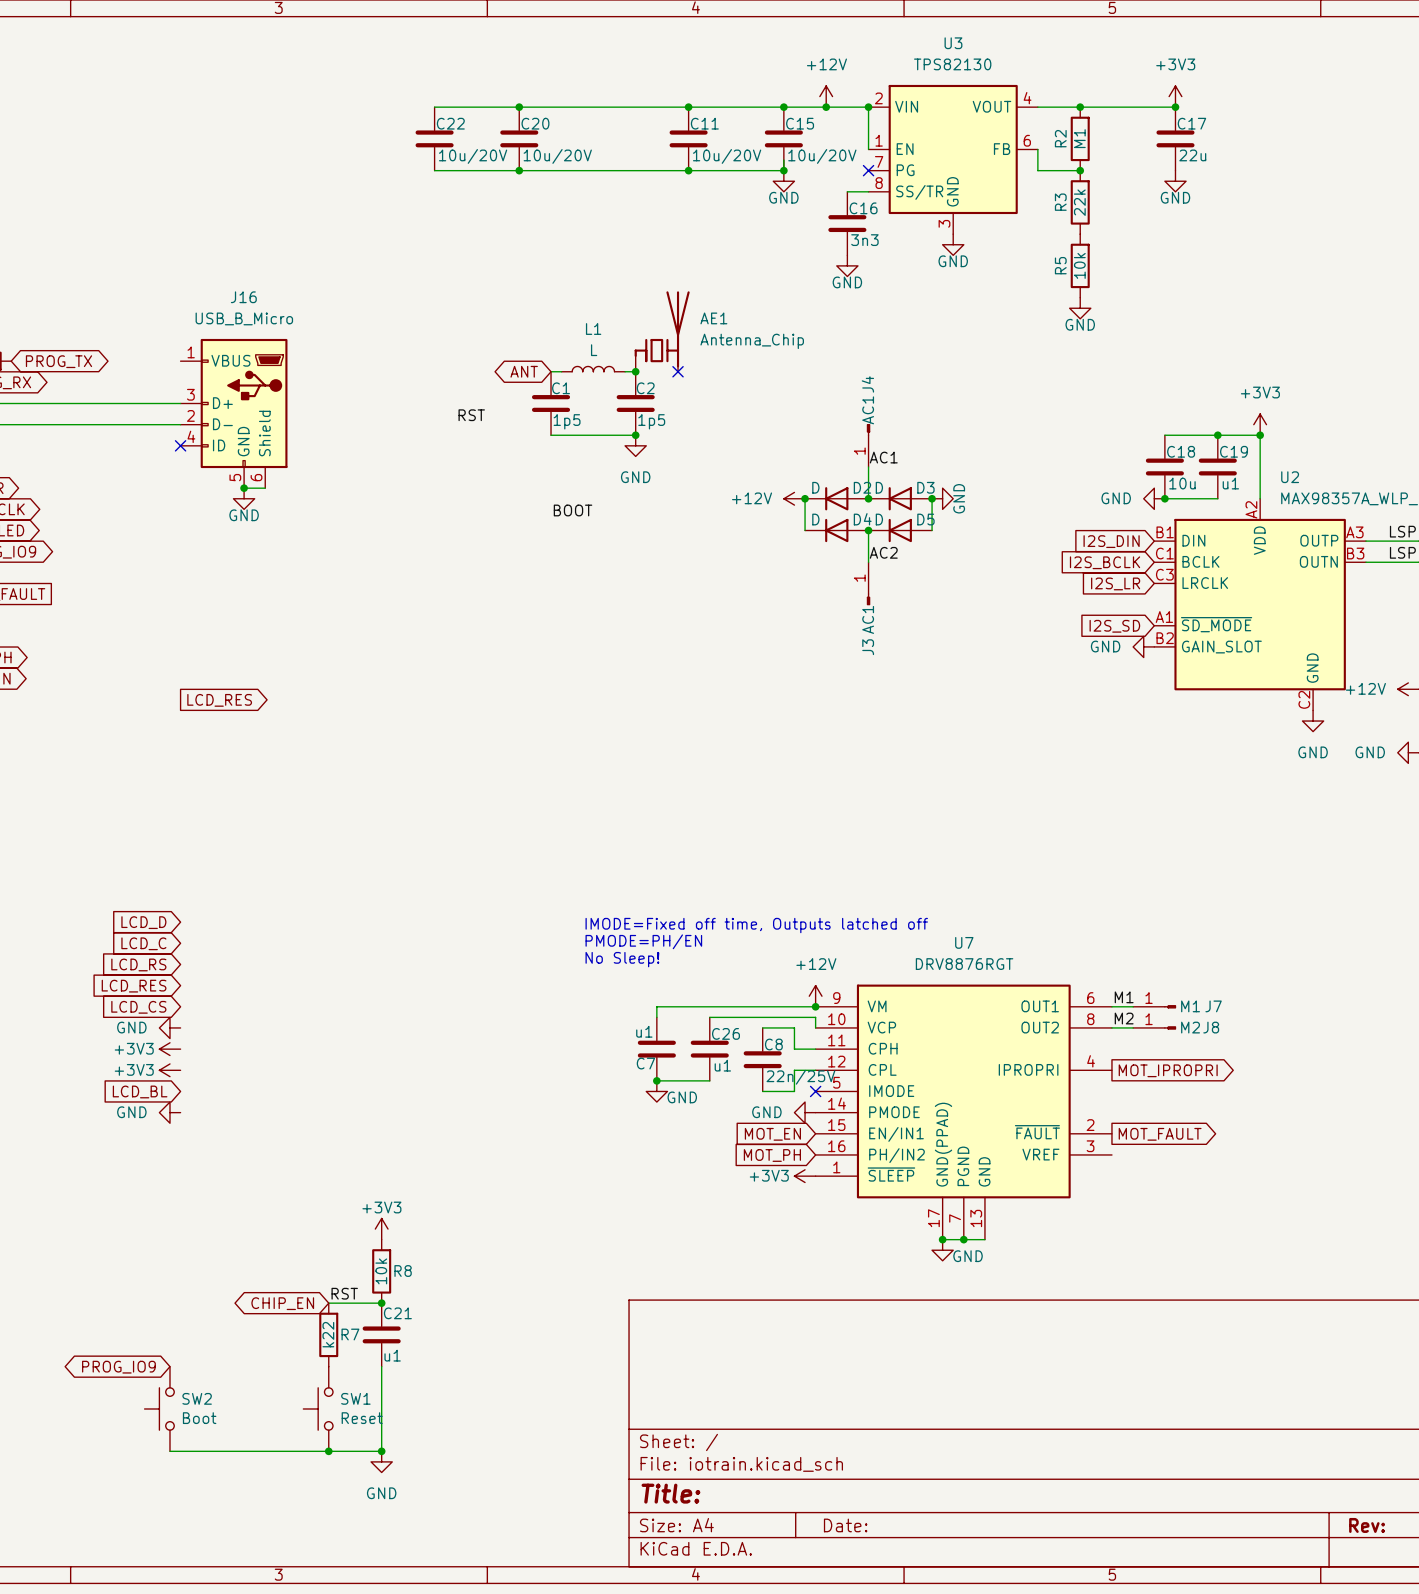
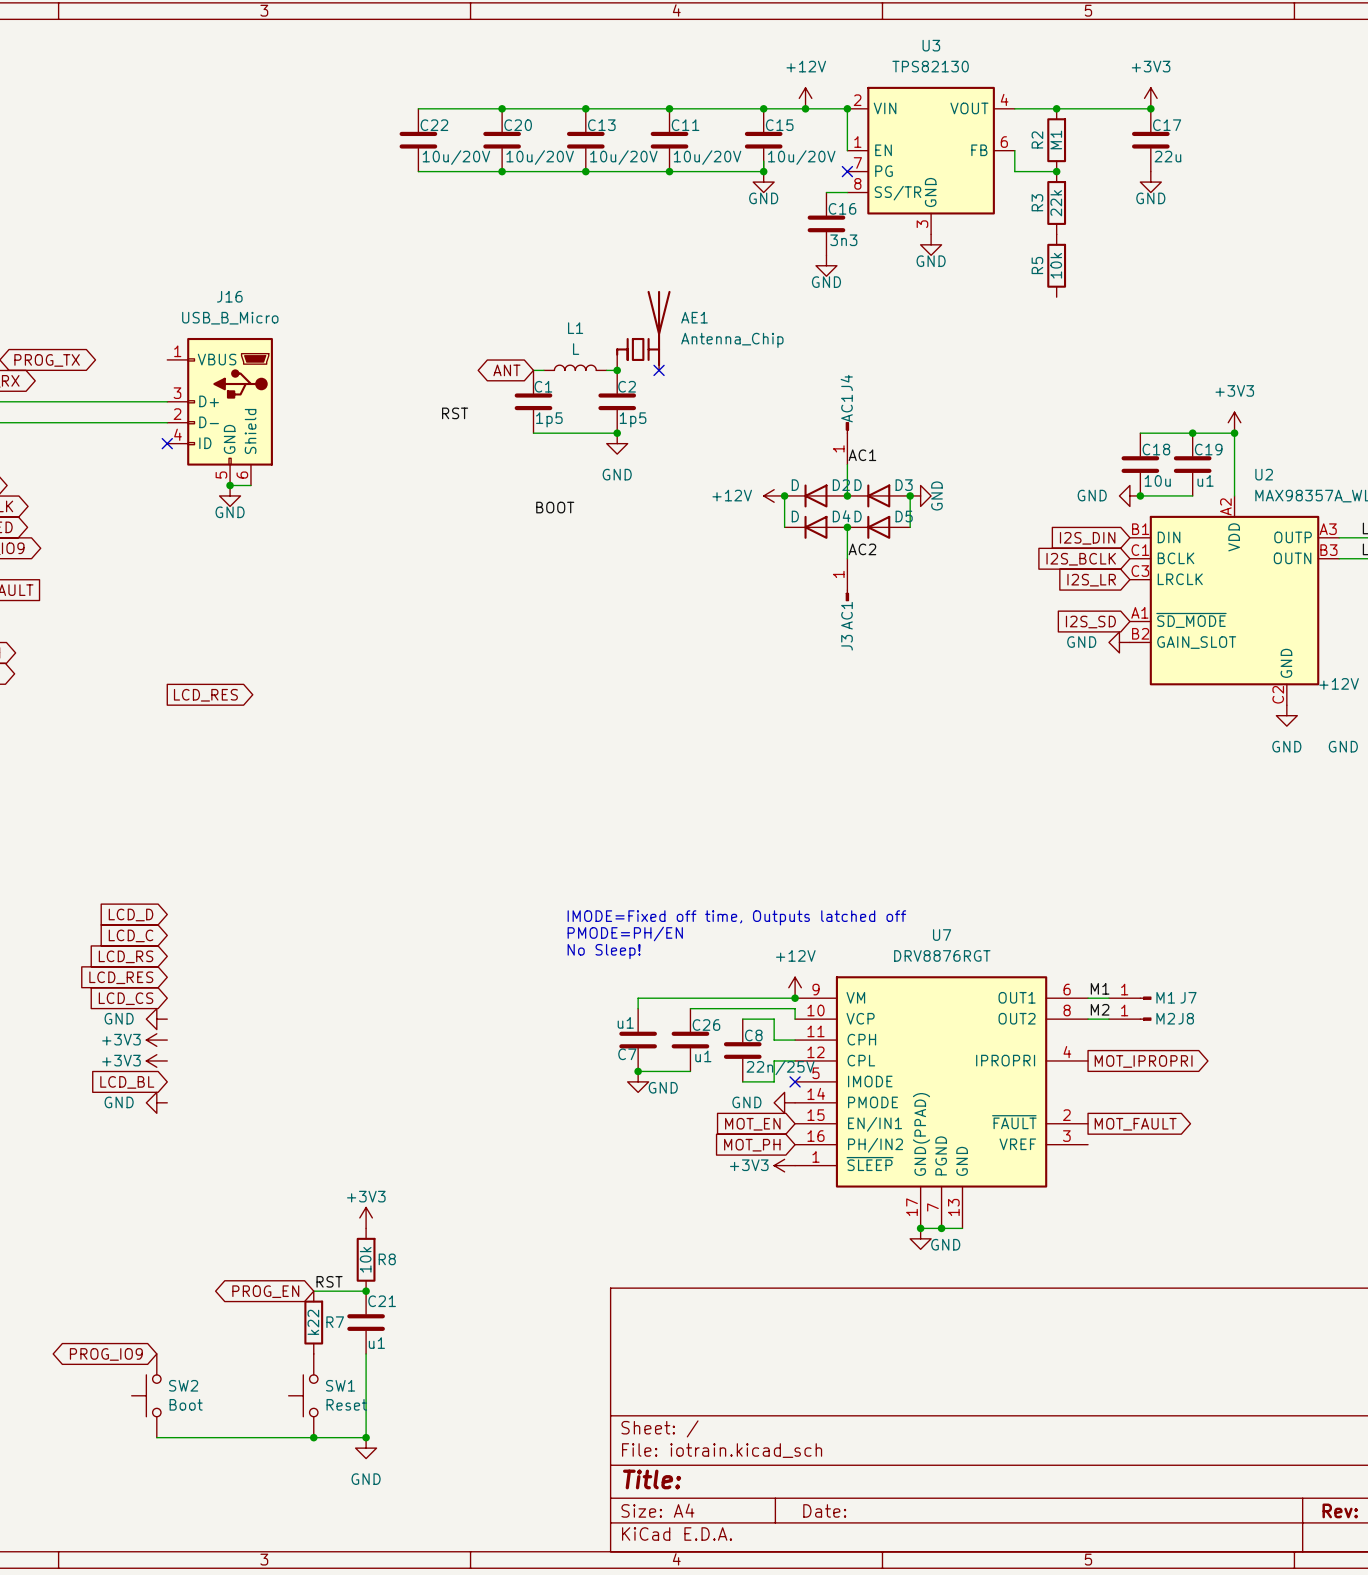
junction: none -> (585, 108)
C13: none -> 10u/20V (585, 140)
junction: none -> (585, 171)
power symbol: GND (1080, 308) -> none
global label: CHIP_EN (282, 1303) -> PROG_EN (265, 1291)

